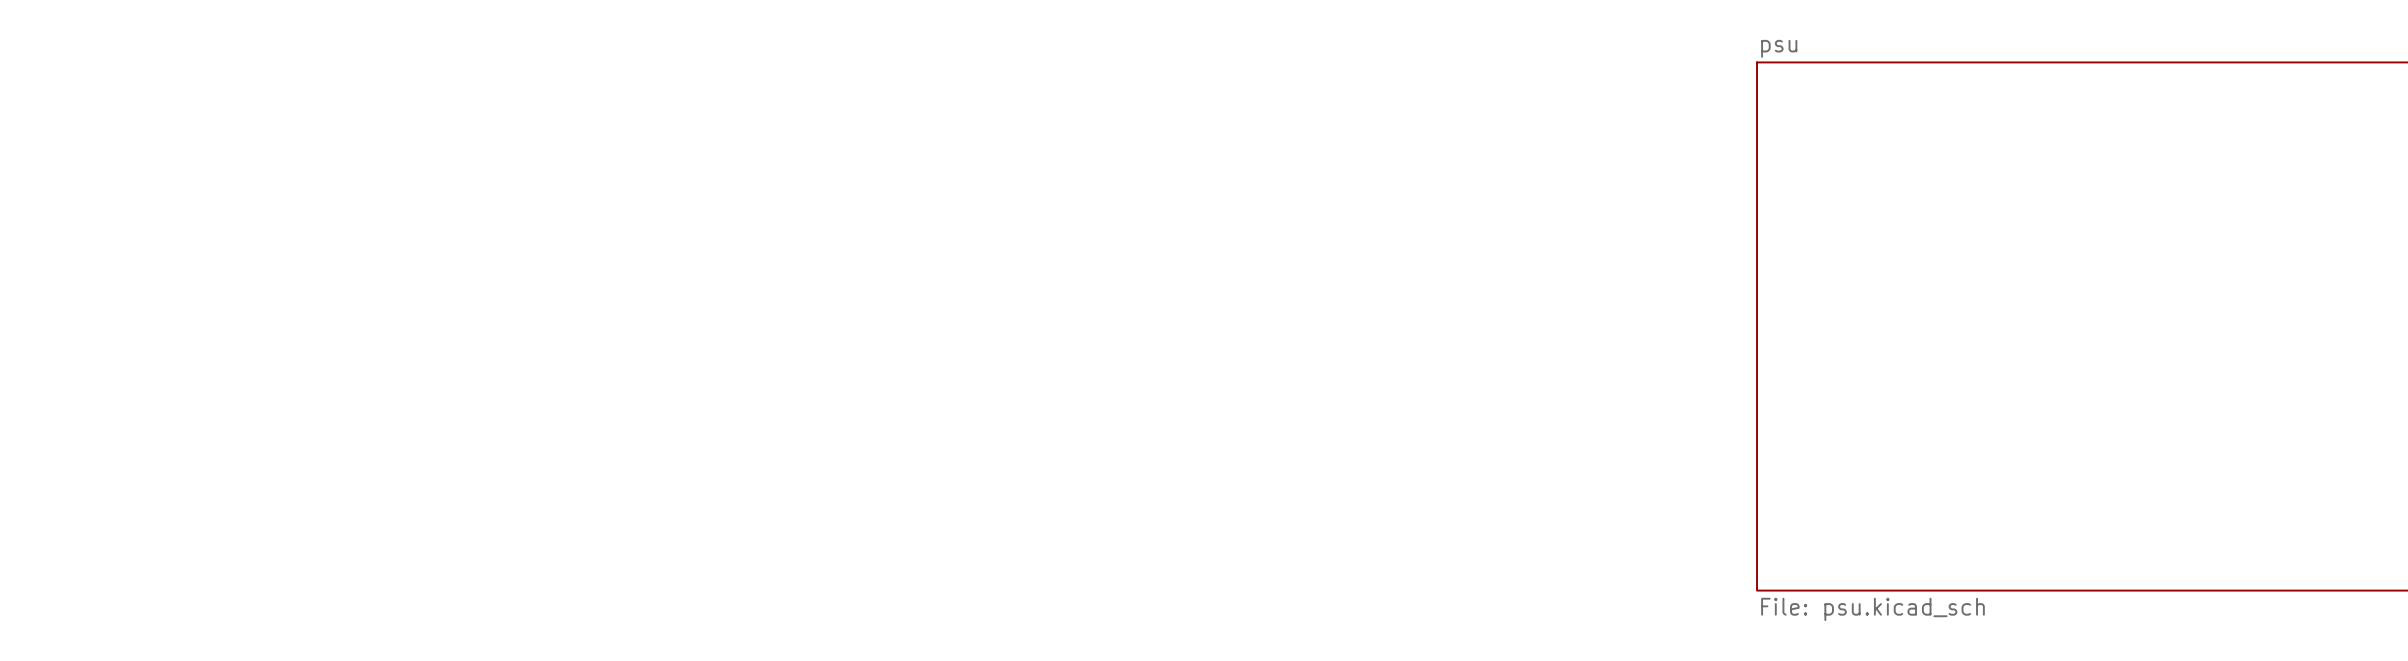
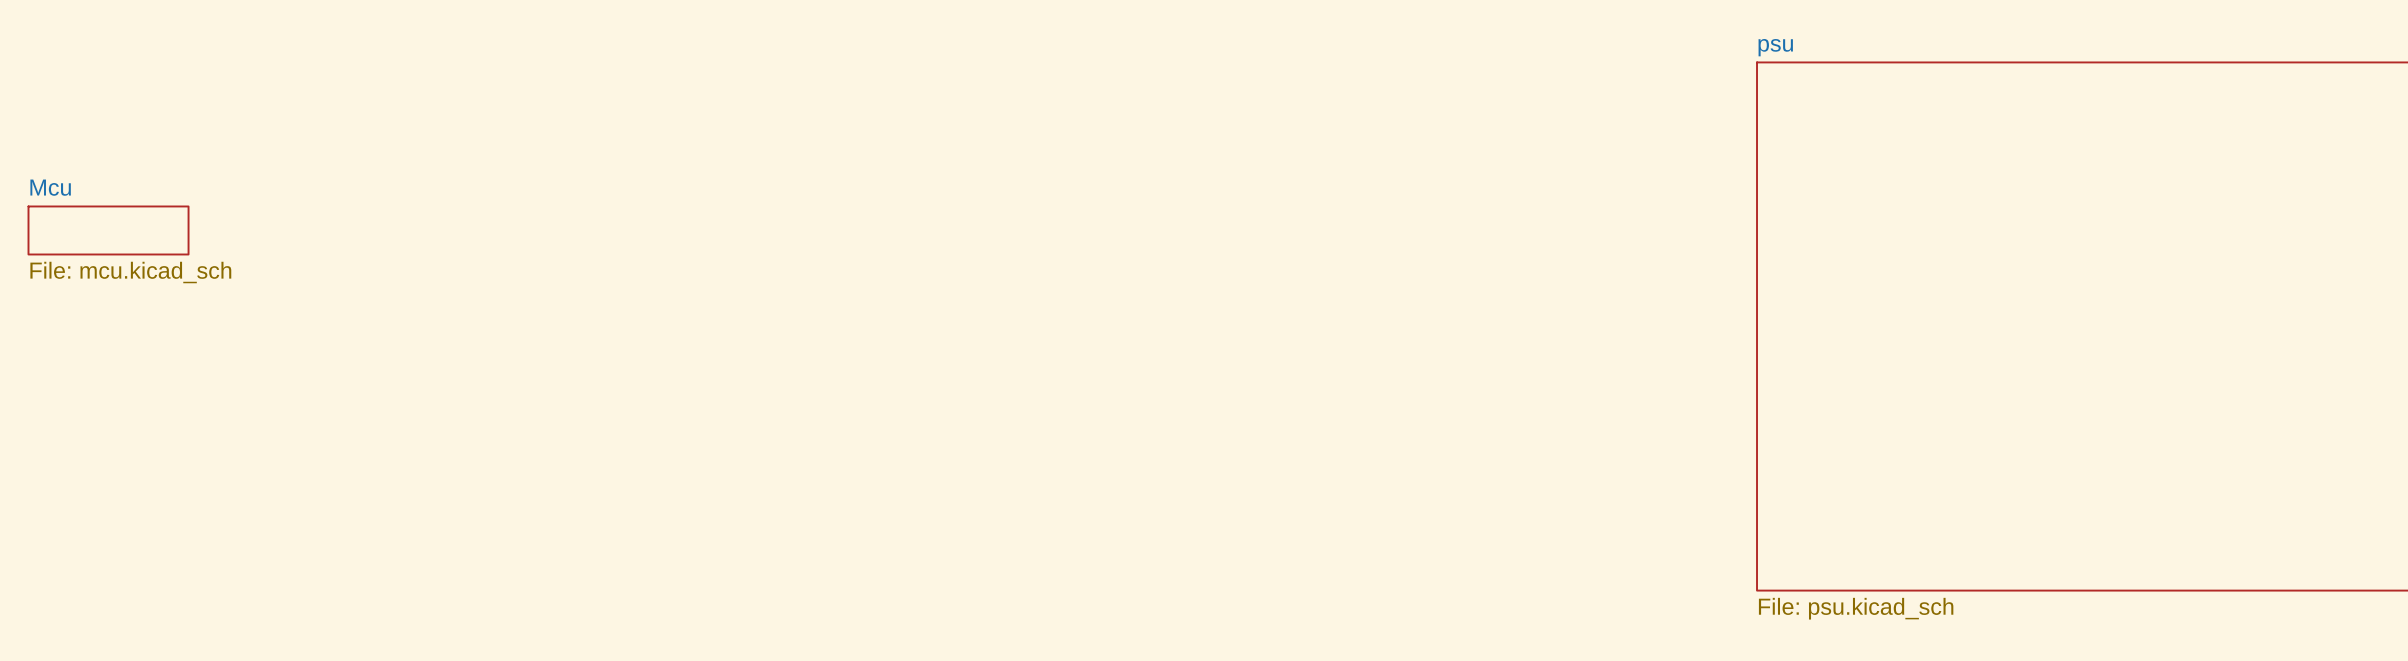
sheet Mcu: none -> File: mcu.kicad_sch (108, 230)

